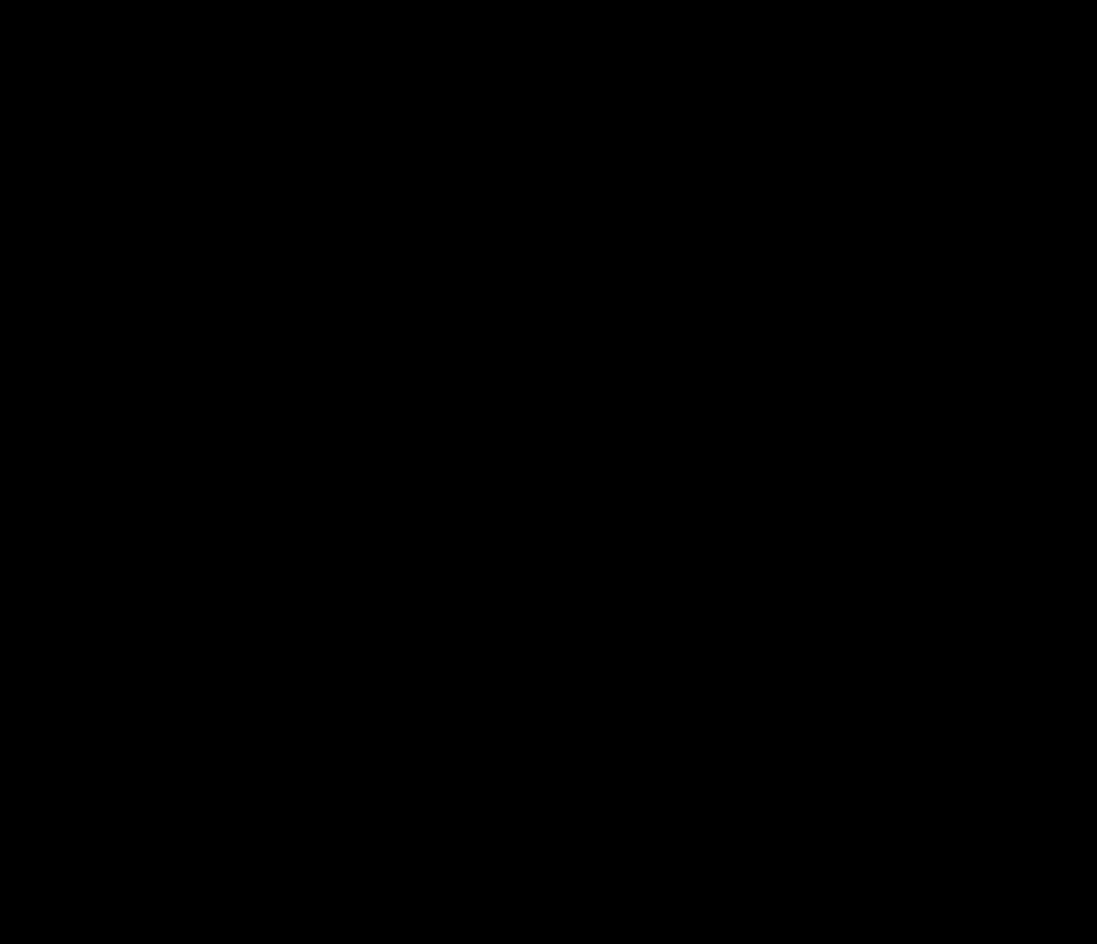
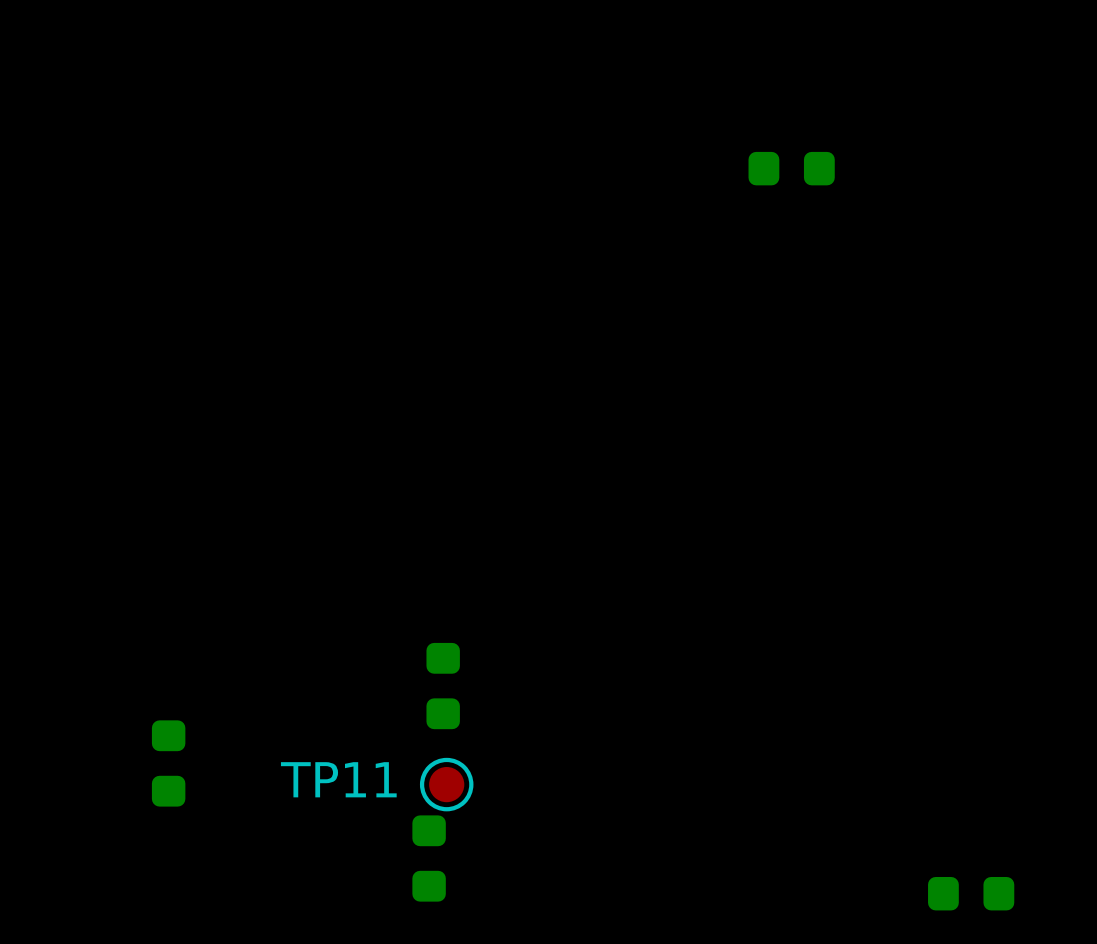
part: none -> (791, 168)
part: none -> (443, 686)
part: none -> (168, 763)
TP11: none -> (446, 784)
part: none -> (429, 858)
part: none -> (971, 893)

